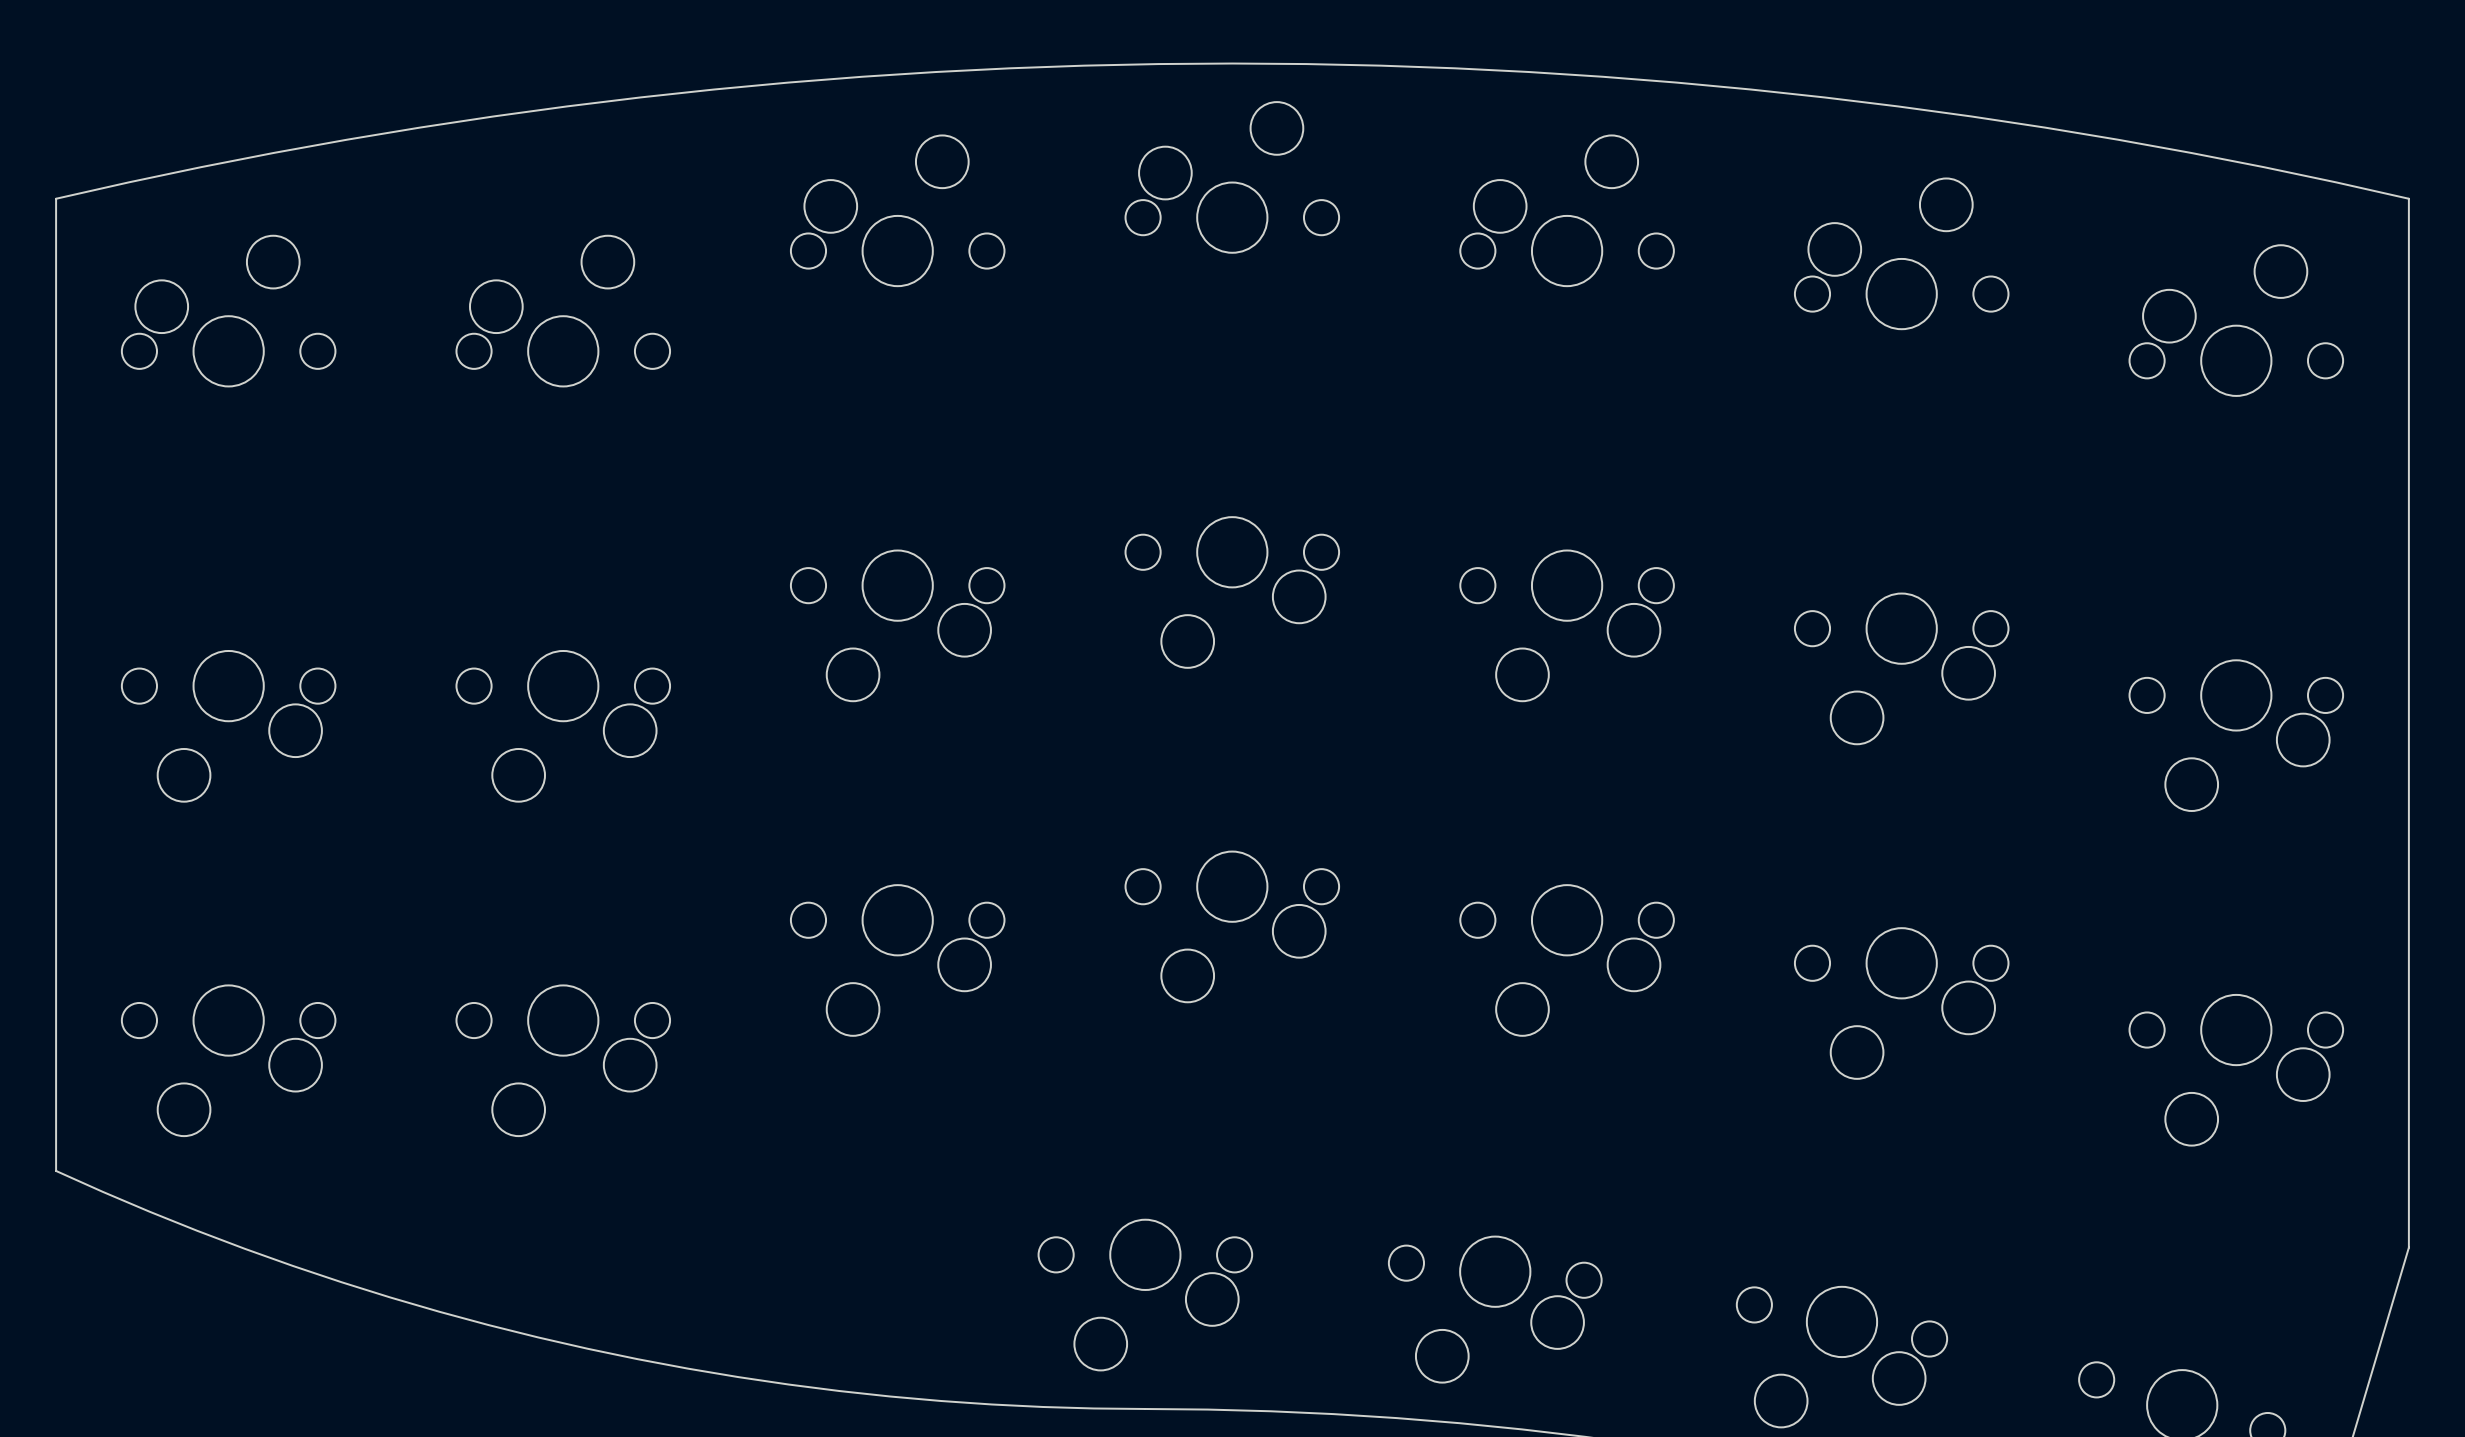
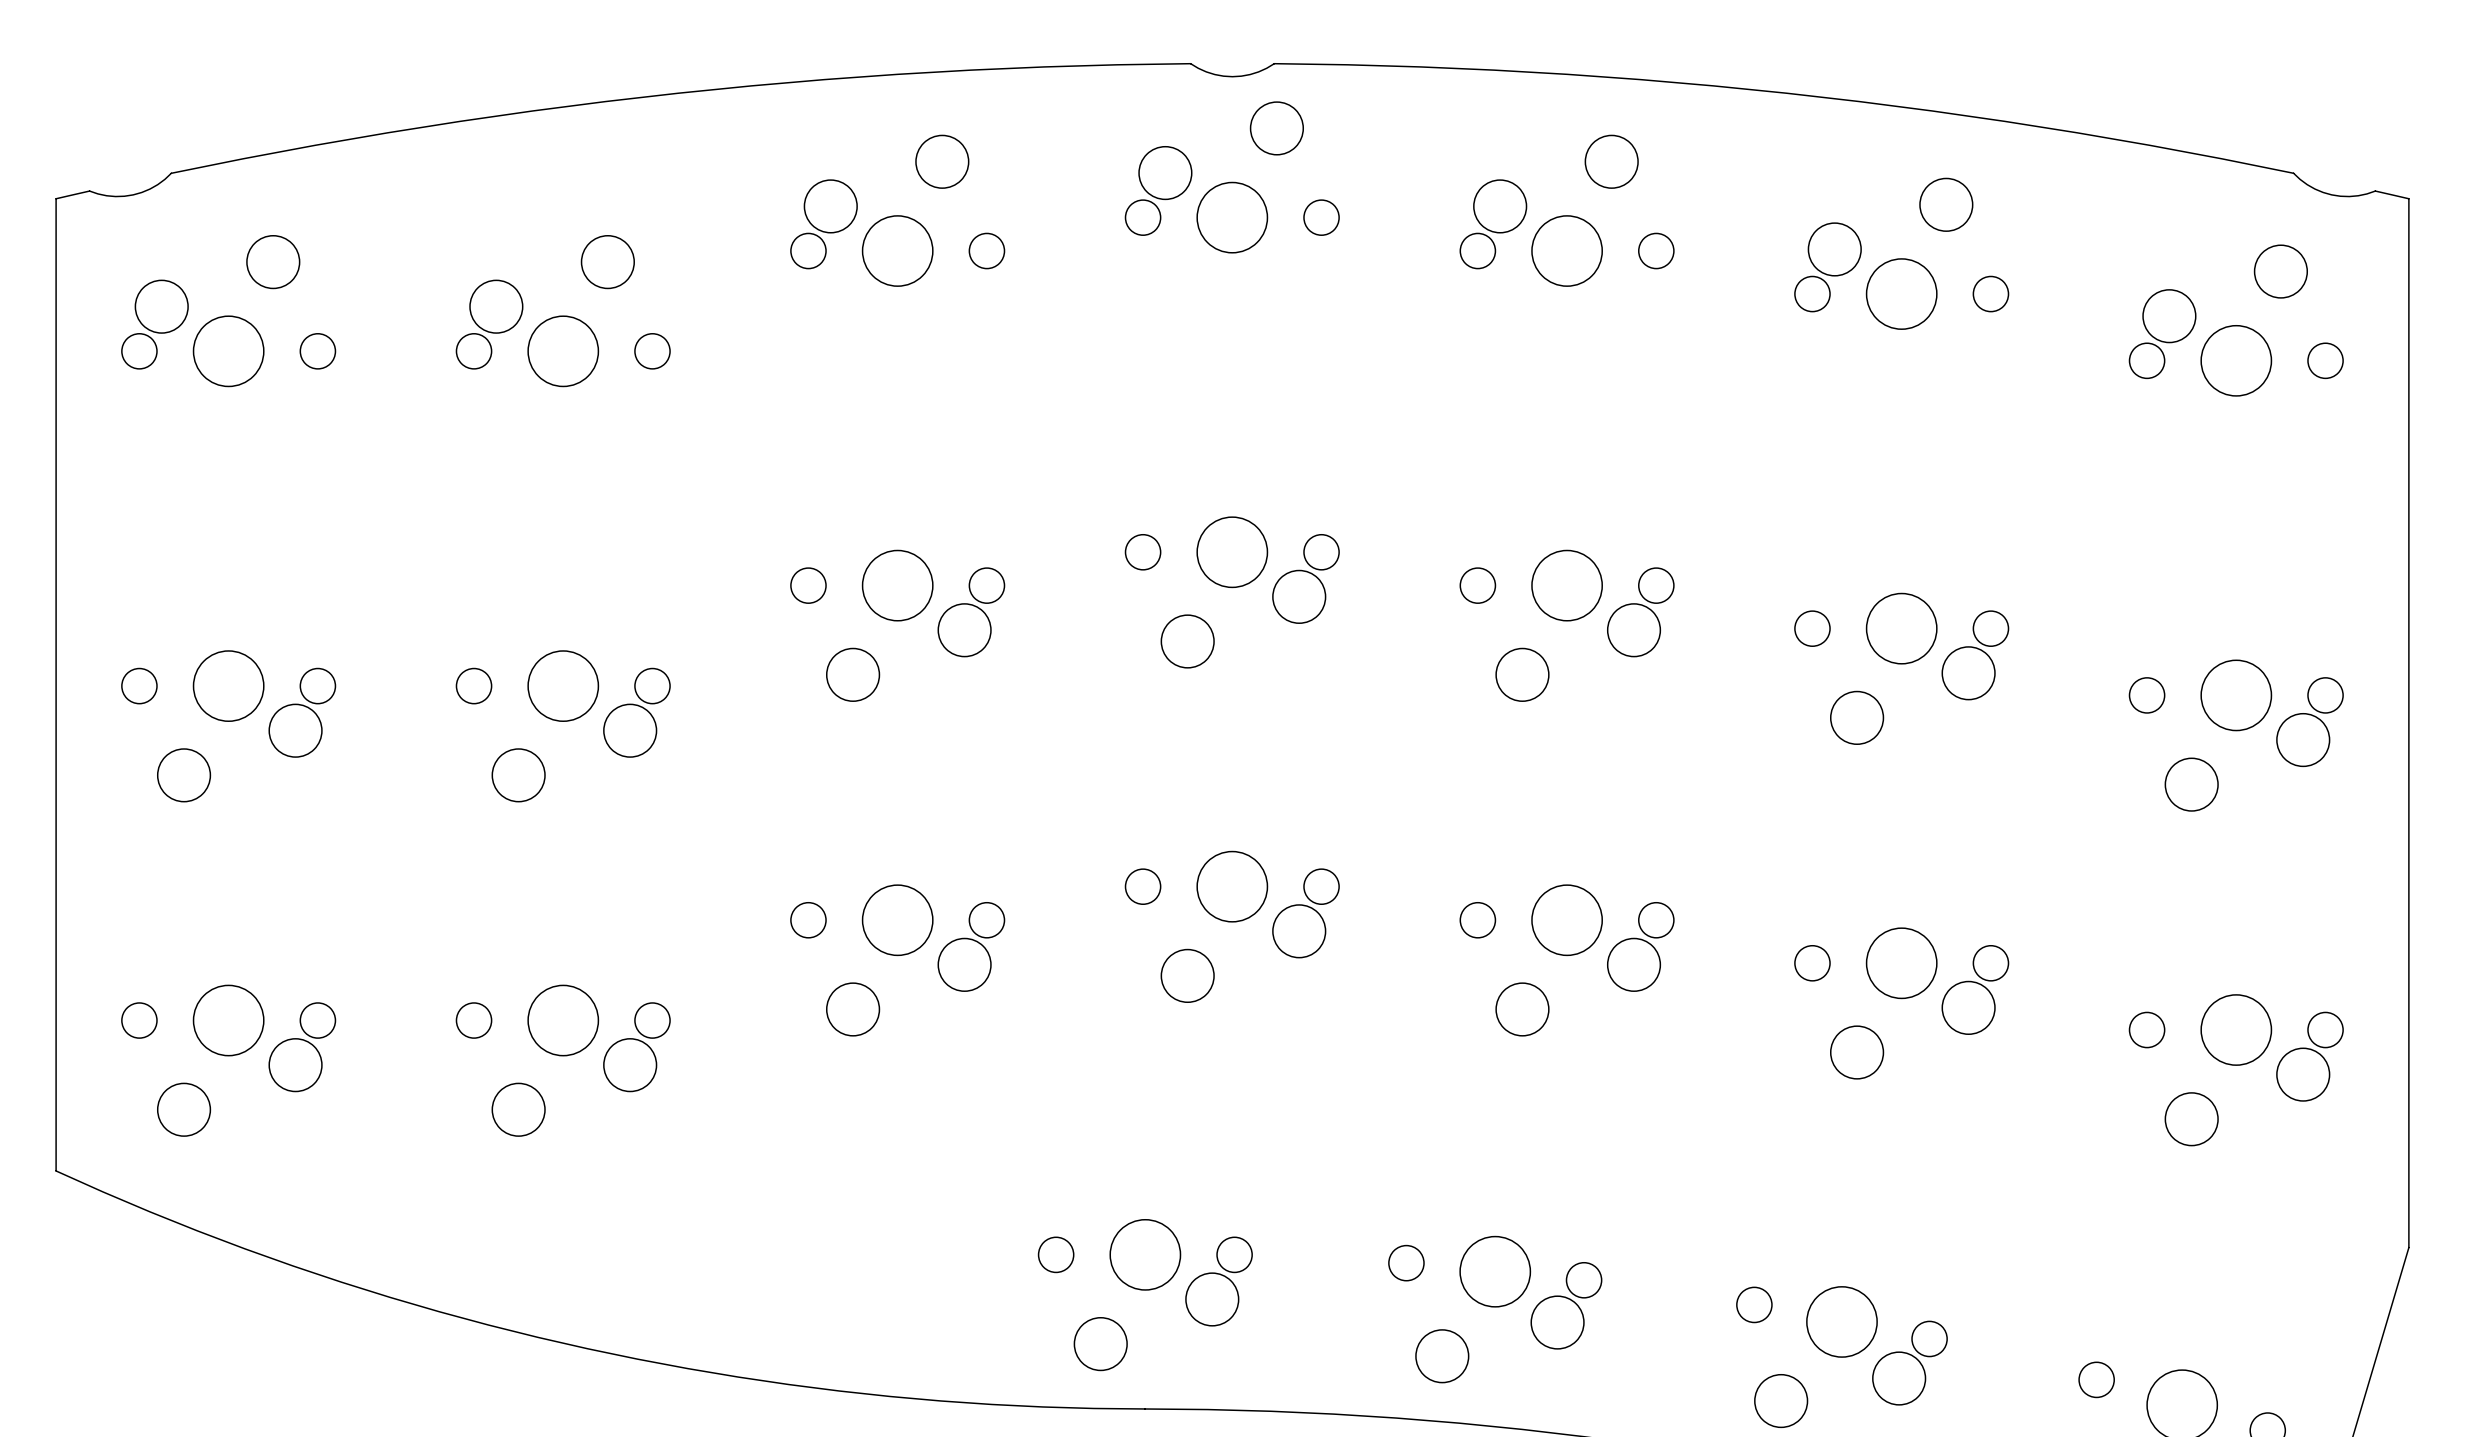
board edge: (56, 198) (201, 167) (346, 139) (493, 116) (640, 97) (788, 82) (935, 72) (1084, 65) (1232, 63) (1380, 65) (1529, 72) (1676, 82) (1824, 97) (1971, 116) (2118, 139) (2263, 167) (2408, 198) -> (56, 198) (89, 191) (106, 195) (133, 194) (150, 189) (171, 173) (387, 132) (532, 110) (678, 93) (824, 79) (1044, 66) (1190, 63) (1214, 74) (1232, 76) (1258, 71) (1274, 63) (1420, 66) (1567, 74) (1713, 85) (1859, 101) (2004, 121) (2221, 158) (2293, 173) (2307, 184) (2331, 194) (2358, 195) (2375, 191) (2408, 198)

